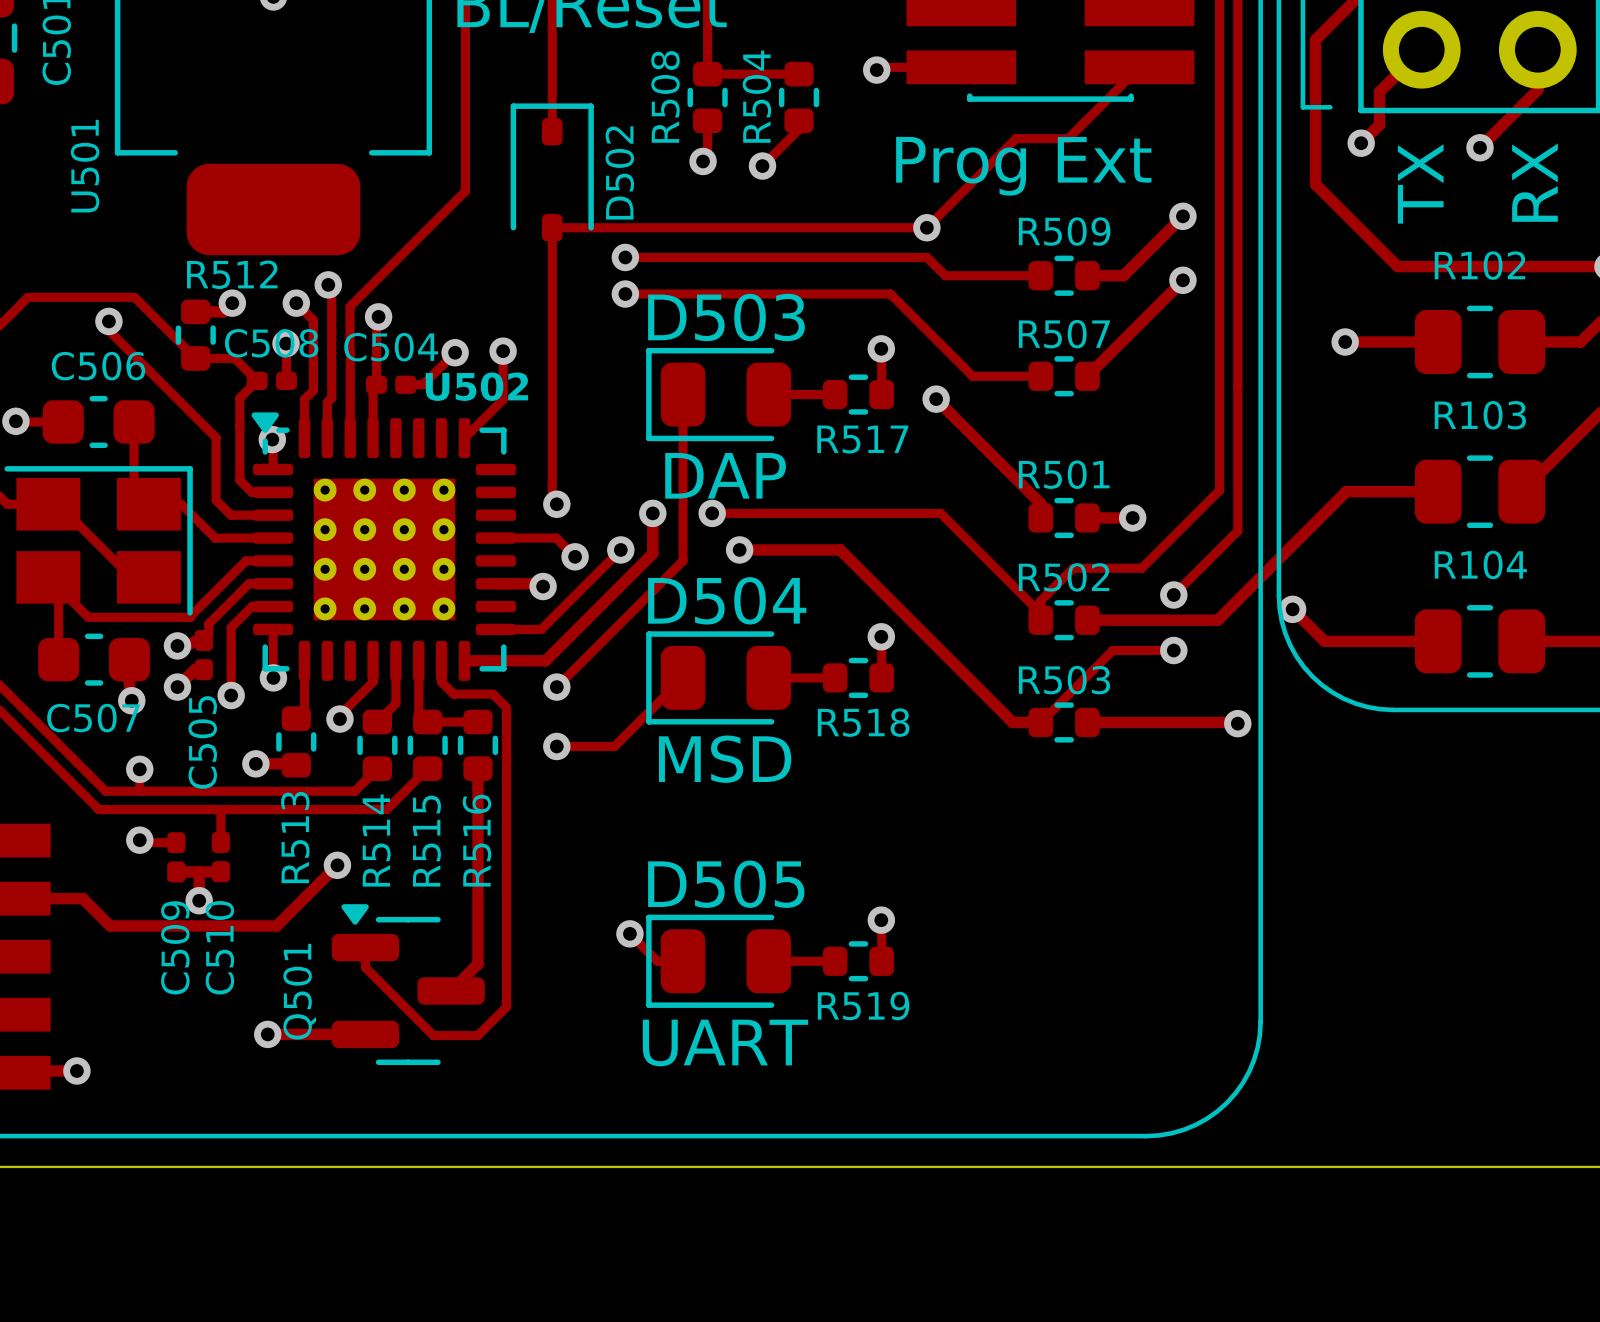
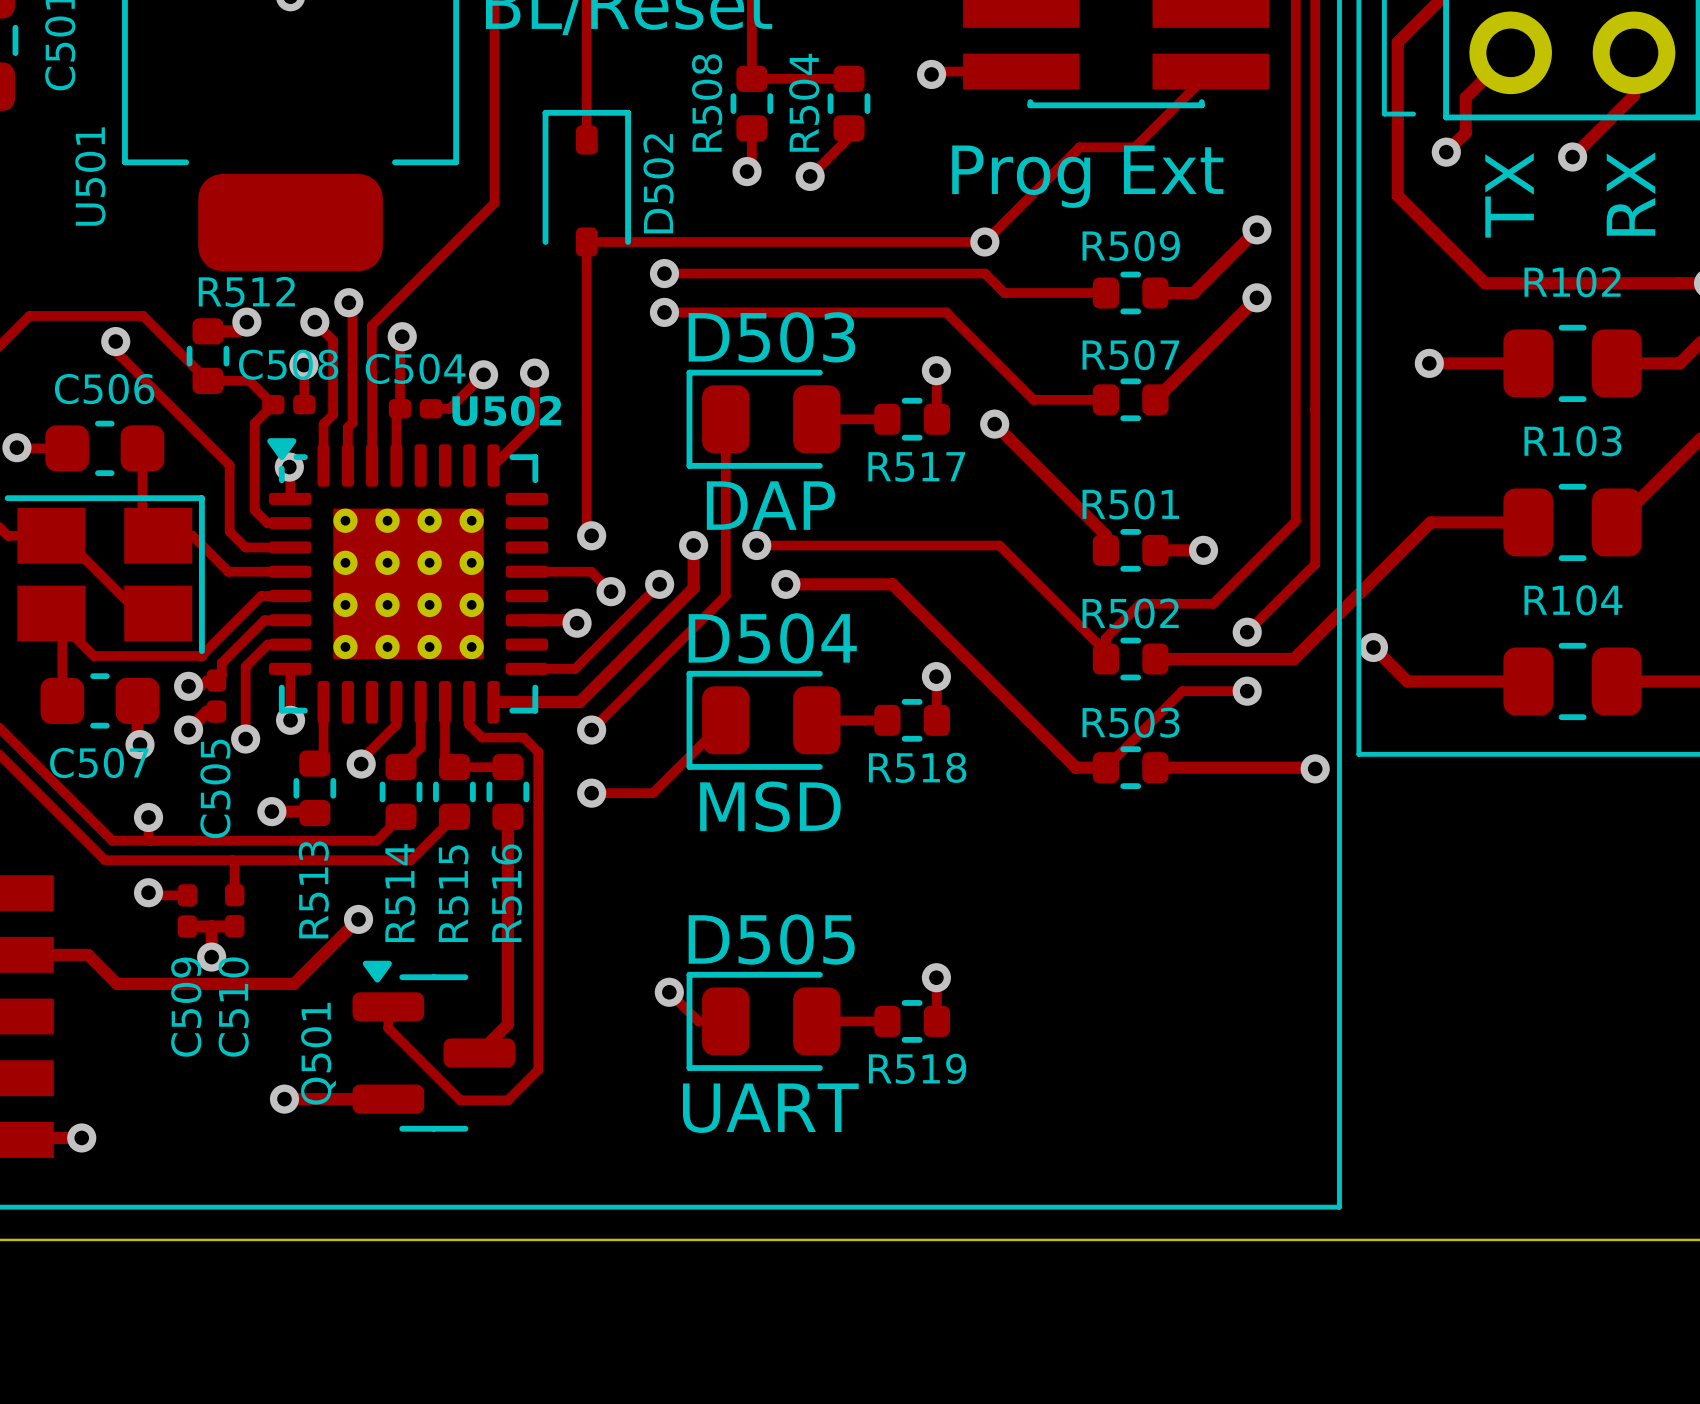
line: (1278, 595) (1281, 621) (1290, 645) (1312, 676) (1332, 692) (1355, 703) (1393, 709) -> (1358, 632) (1358, 754) (1480, 754)
line: (1260, 1021) (1254, 1059) (1243, 1082) (1227, 1102) (1207, 1118) (1184, 1129) (1146, 1136) -> (1339, 1085) (1339, 1207) (1218, 1207)

